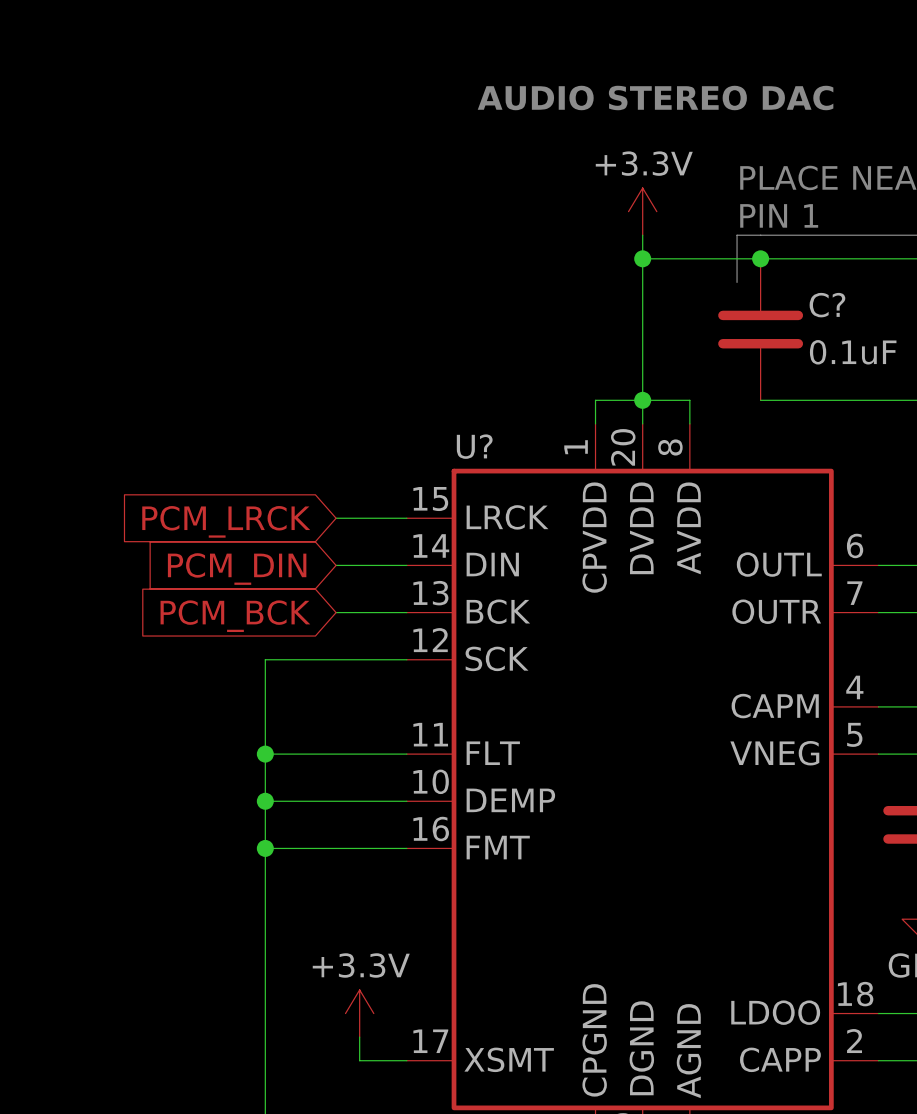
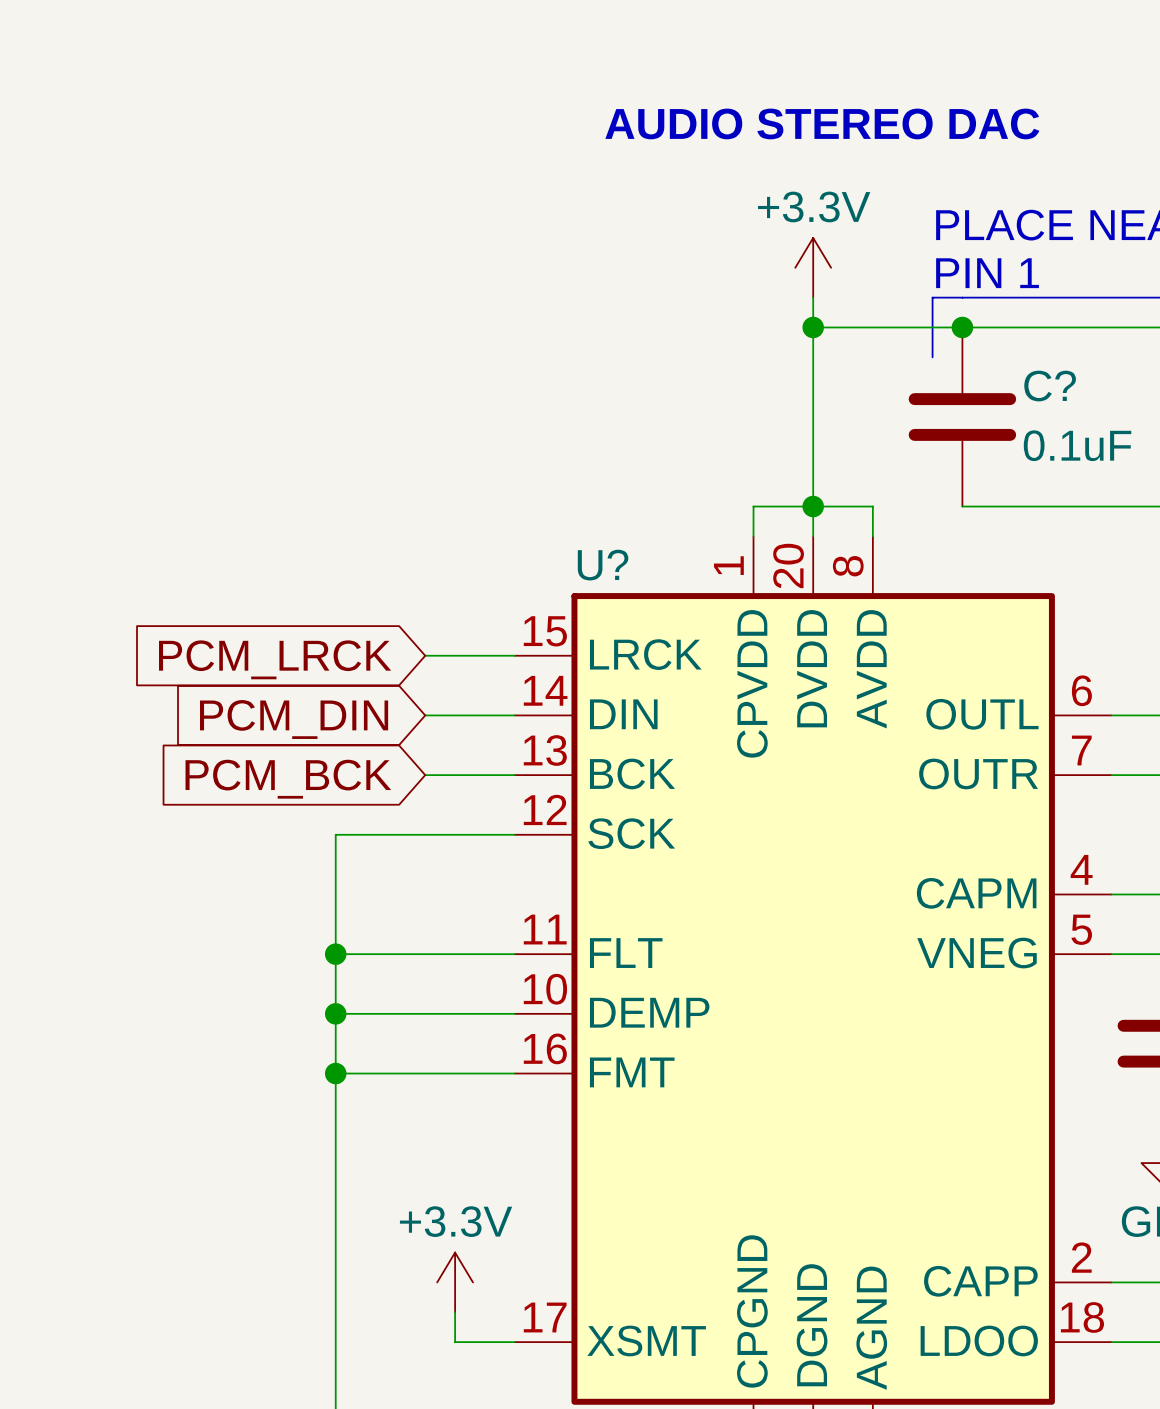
U? pin number: 18 (855, 994) -> 2 (1081, 1257)
U? pin name: LDOO (775, 1012) -> CAPP (980, 1281)
U? pin number: 2 (854, 1041) -> 18 (1082, 1317)
U? pin name: CAPP (780, 1059) -> LDOO (979, 1340)

